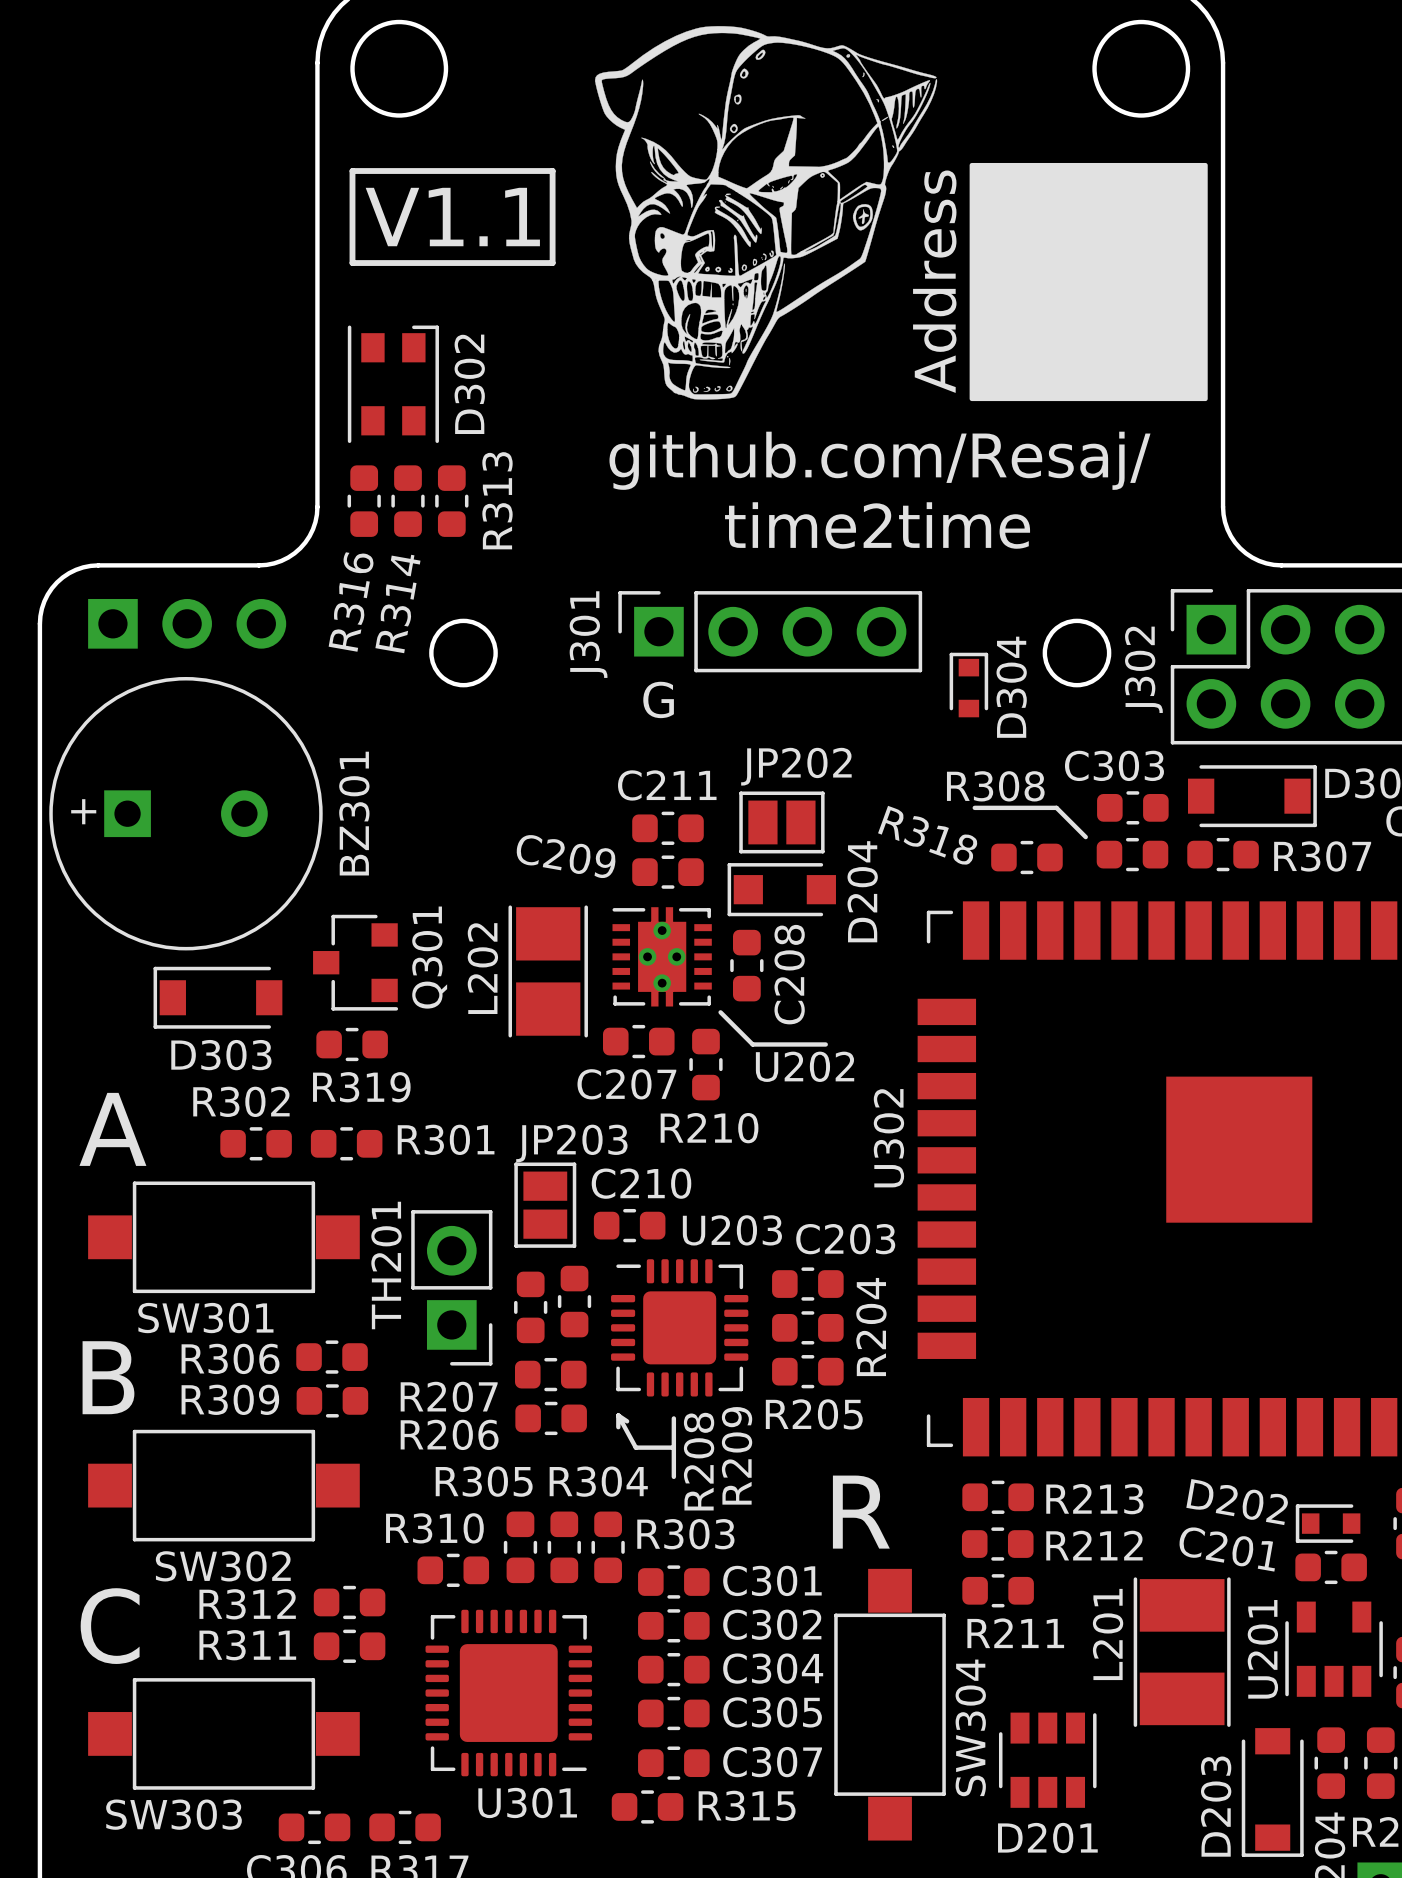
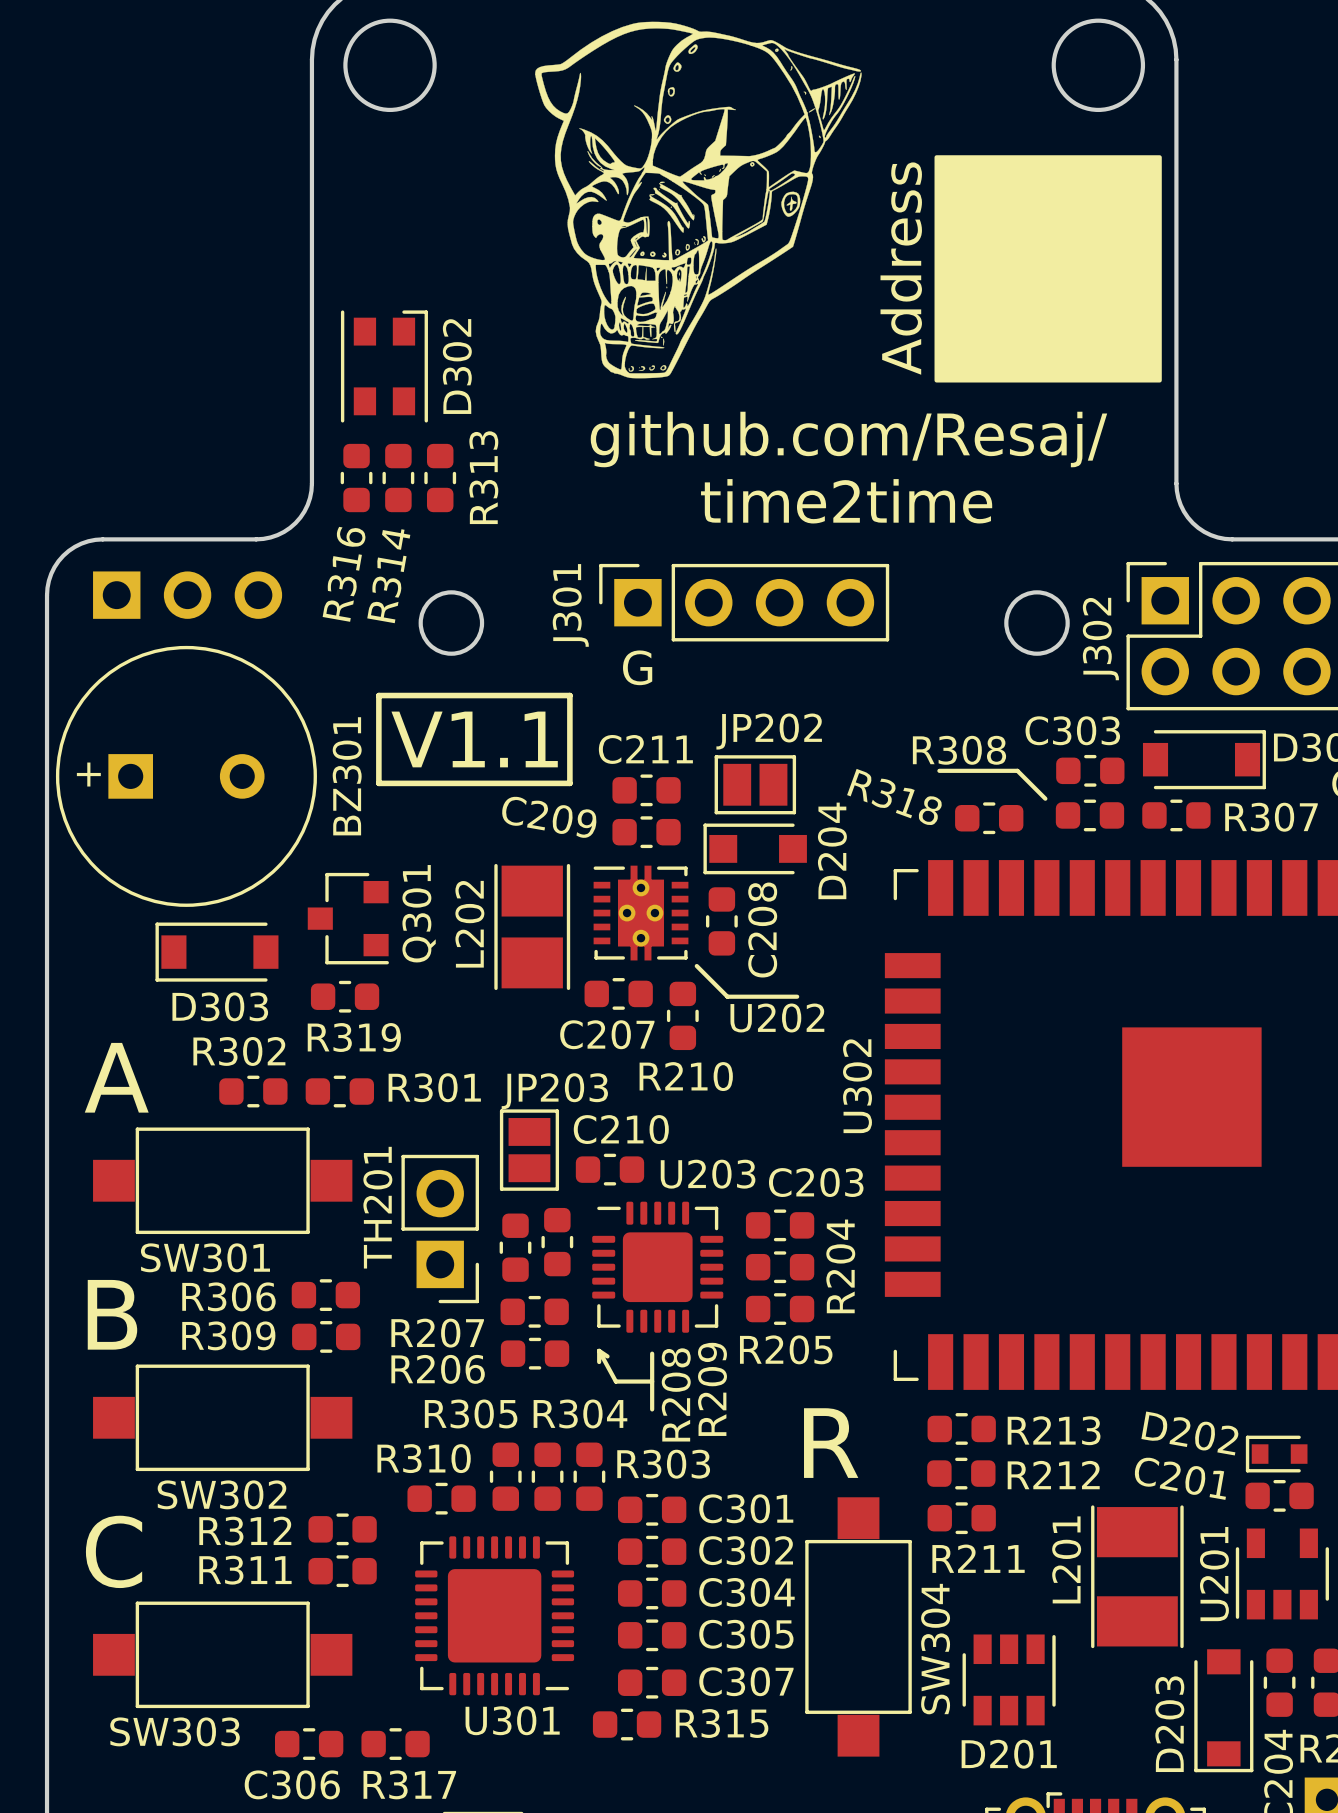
line: (352, 171) (352, 263) (552, 263) (552, 171) (352, 171) -> (378, 695) (378, 783) (569, 783) (569, 695) (378, 695)
drawing position: (766, 212) -> (698, 200)
text position: V1.1 (452, 217) -> V1.1 (474, 739)
D304: (968, 685) -> none

